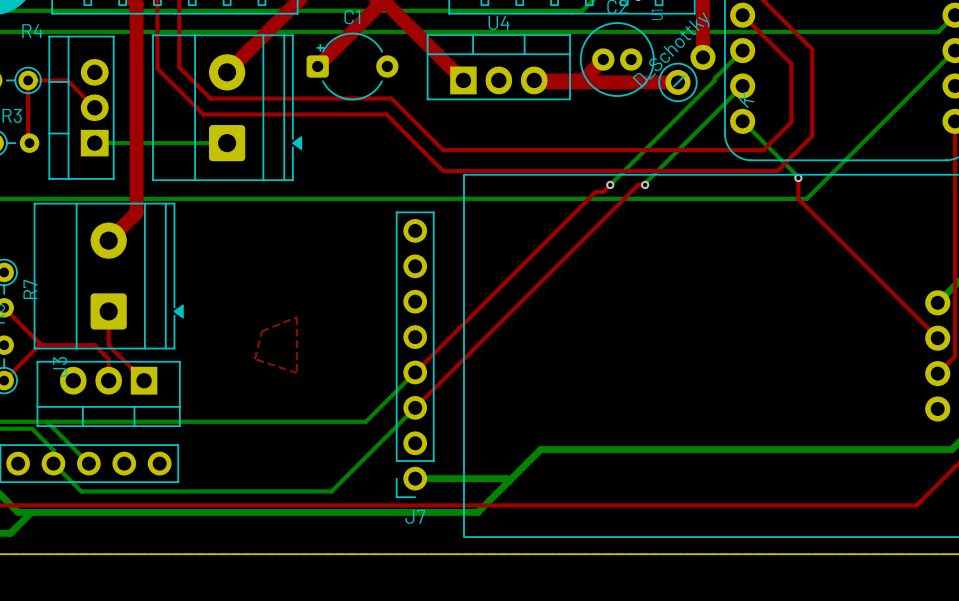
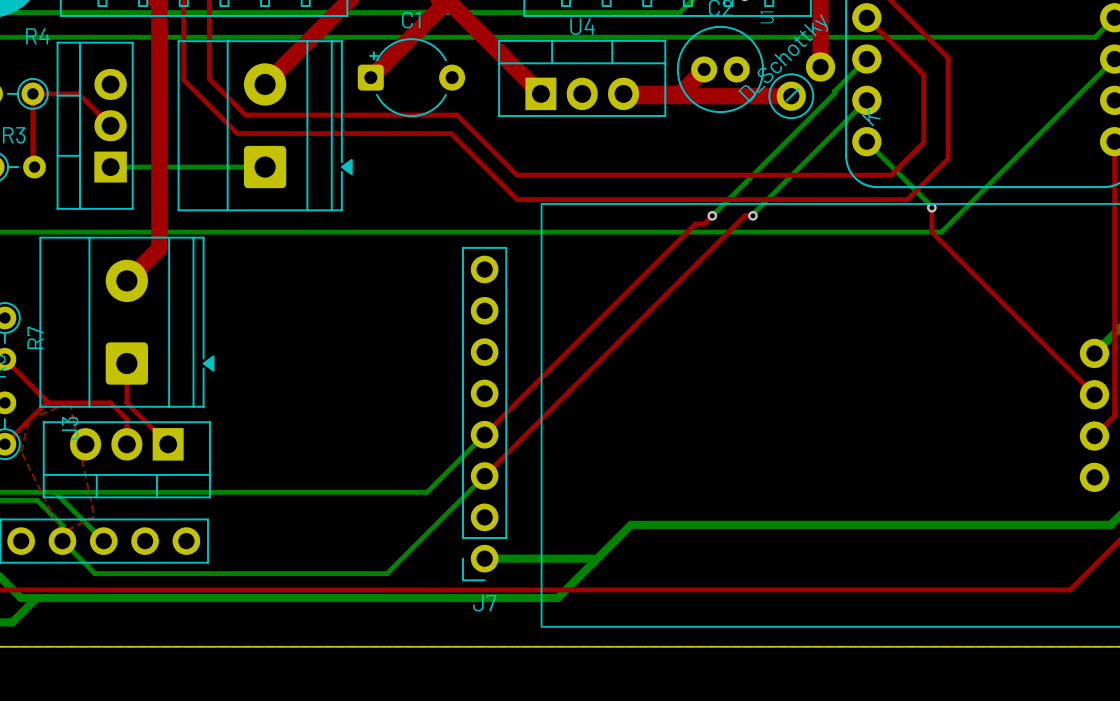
top zone outline: (296, 317) (261, 331) (254, 359) (296, 373) (296, 317) -> none
top zone outline: none -> (69, 402) (29, 419) (21, 451) (61, 532) (94, 516) (69, 402)

